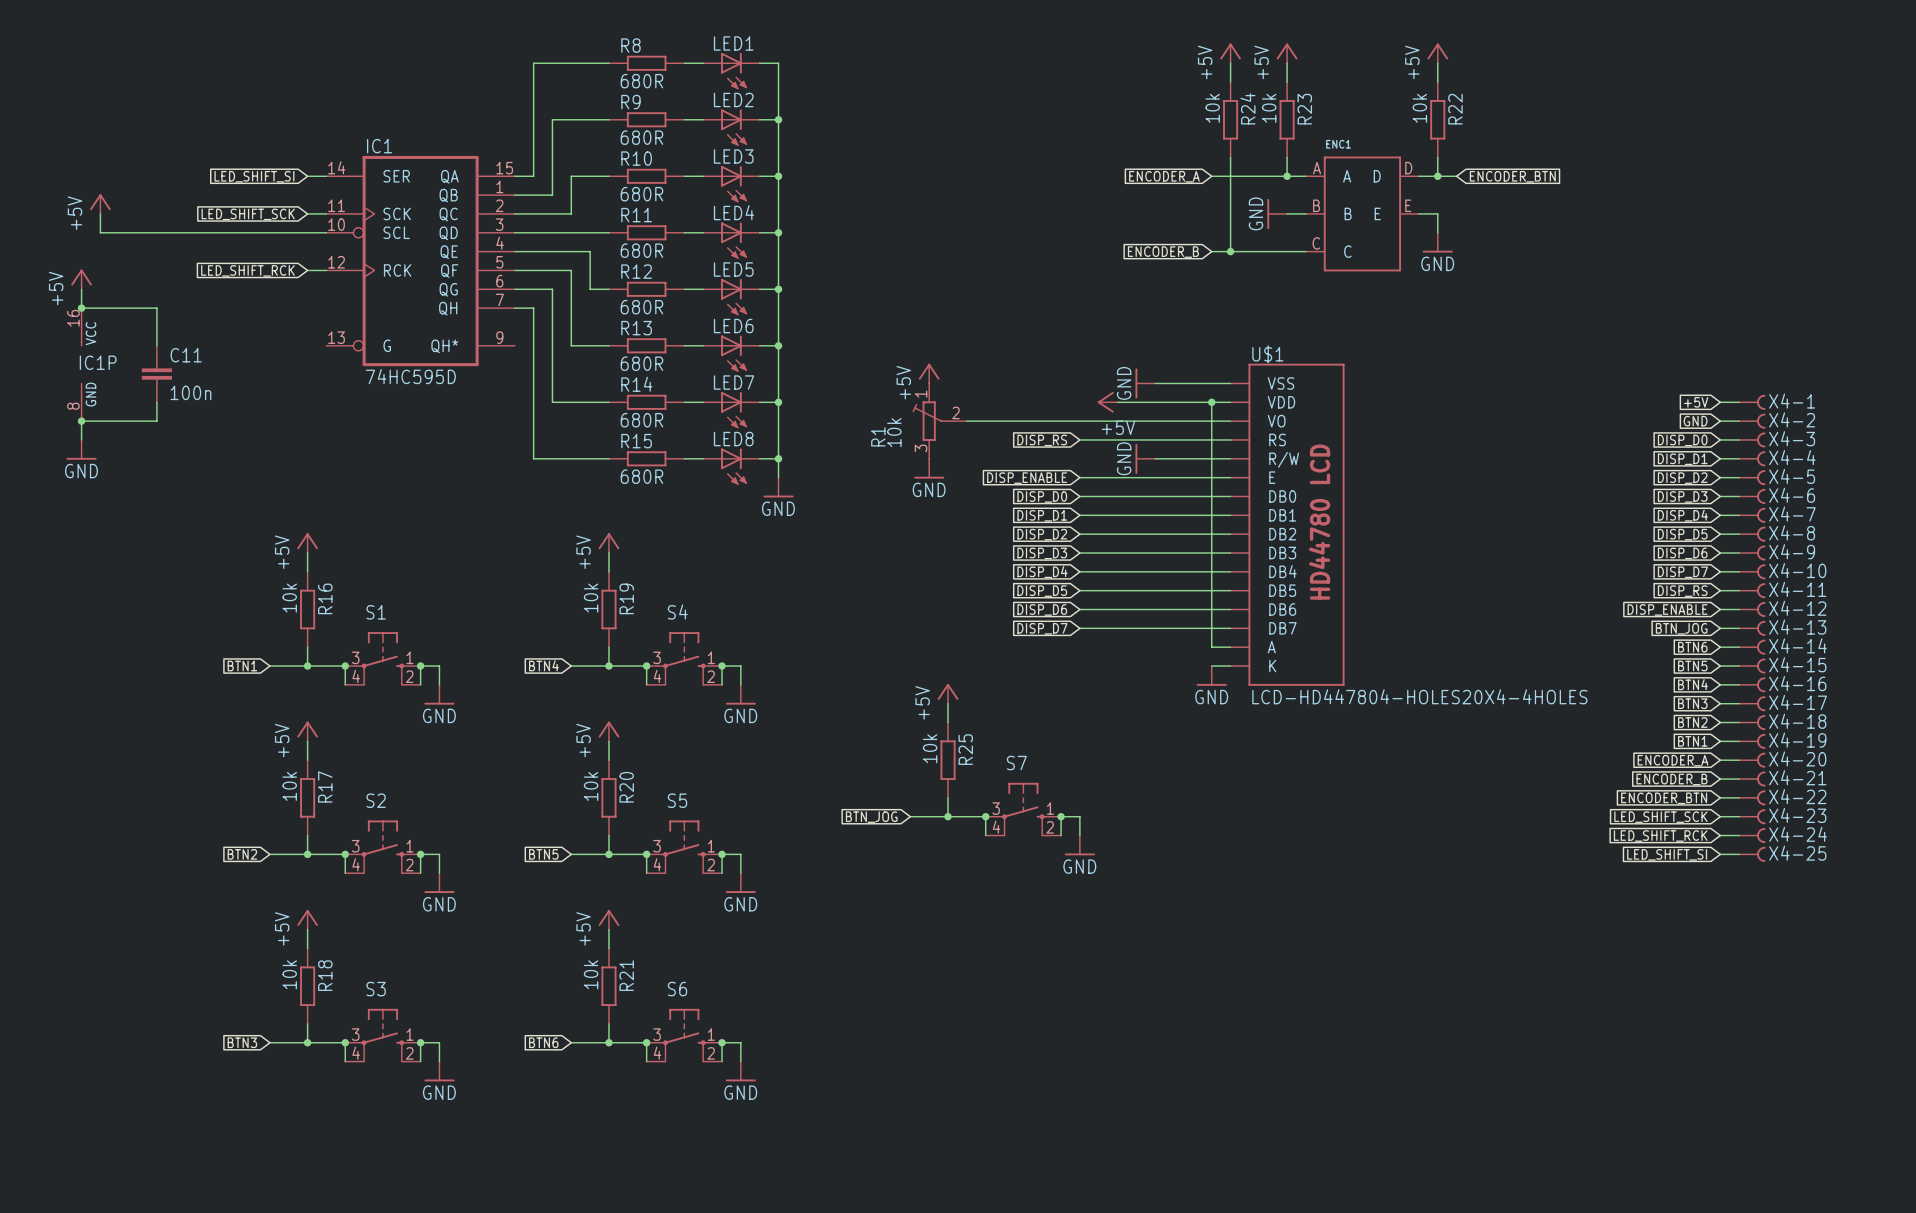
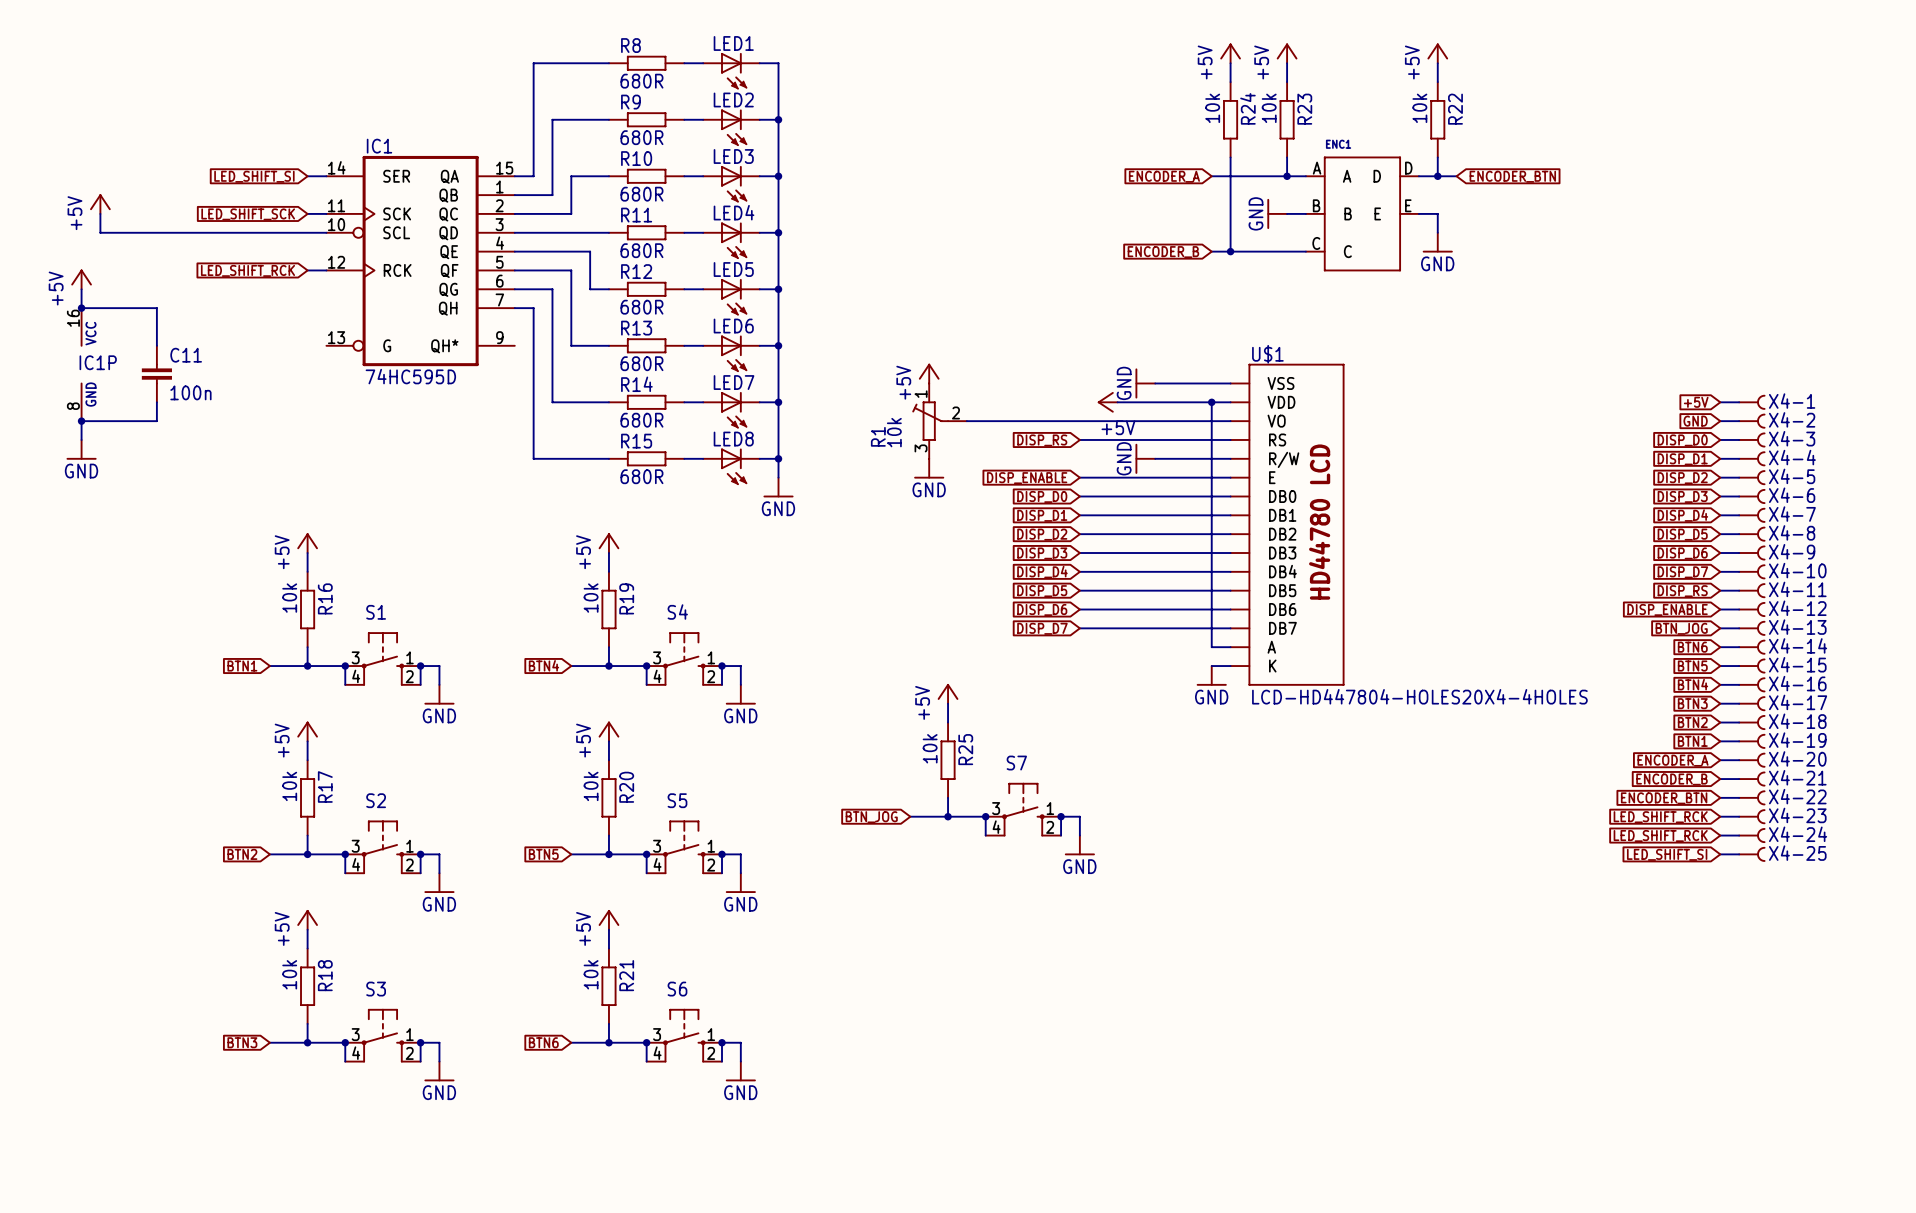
global label: LED_SHIFT_SCK (1660, 817) -> LED_SHIFT_RCK (1660, 817)

